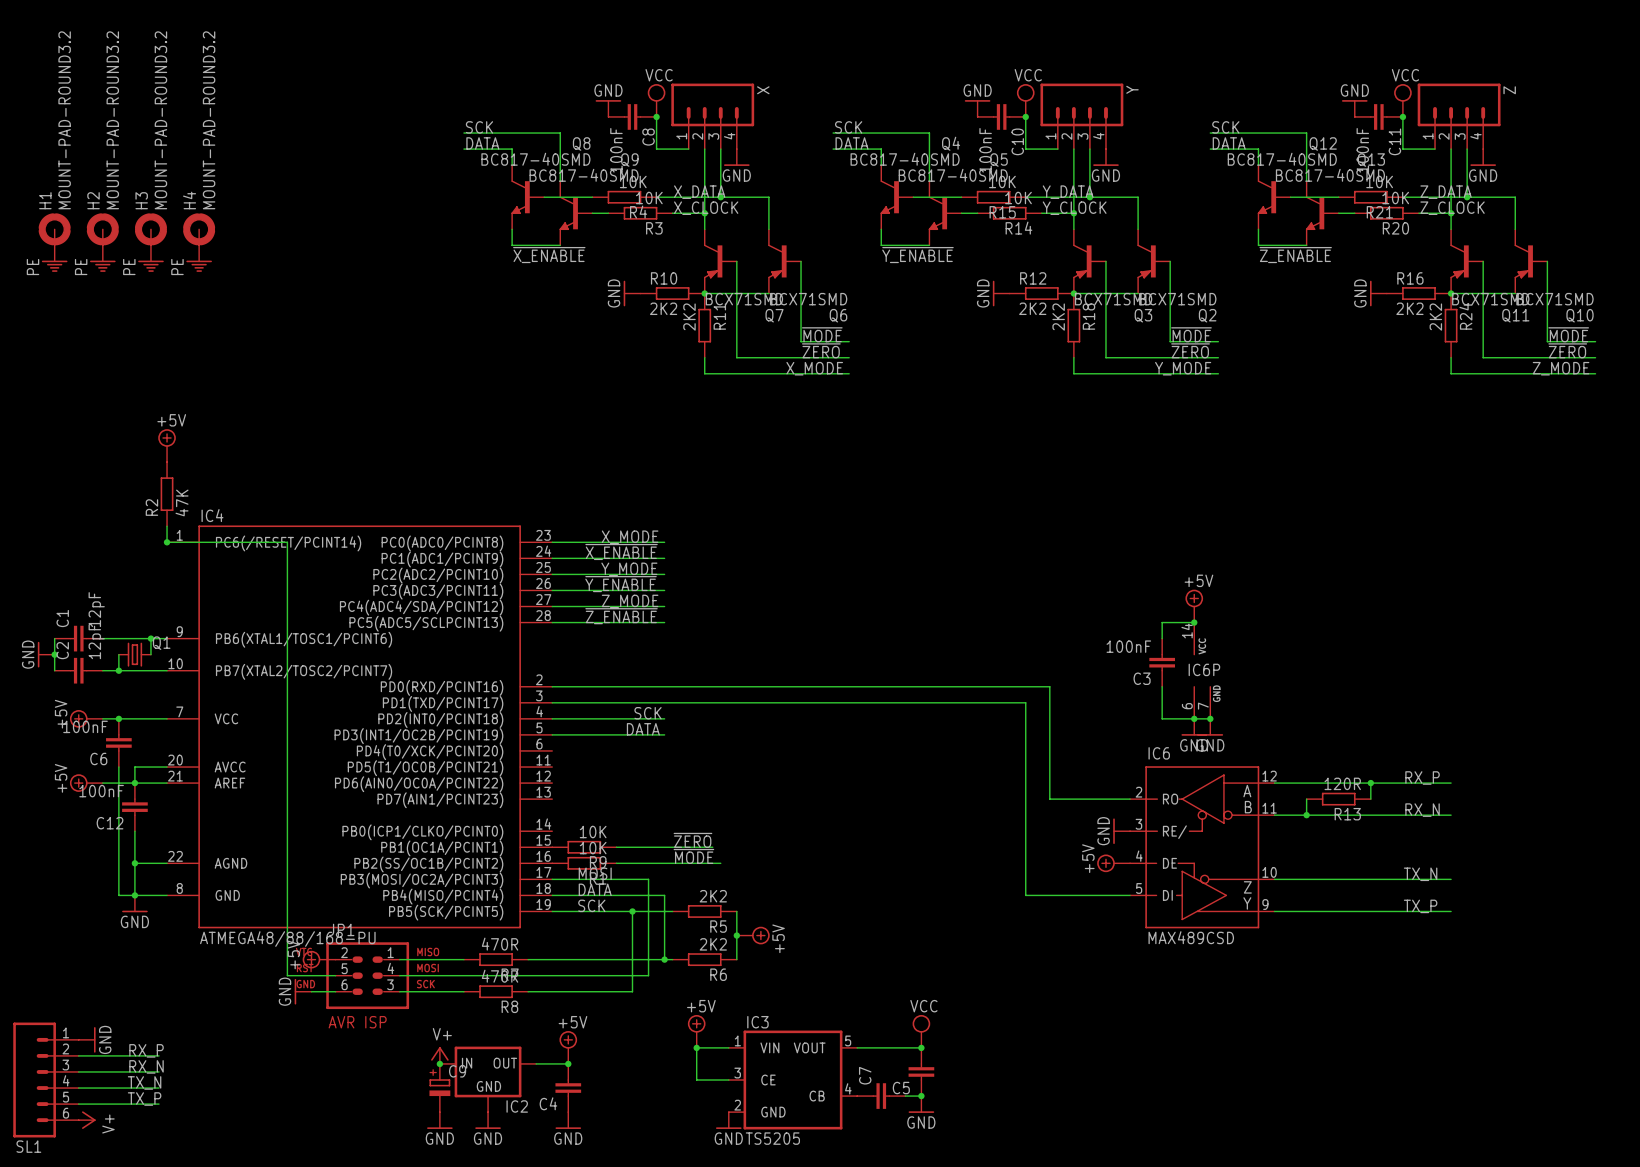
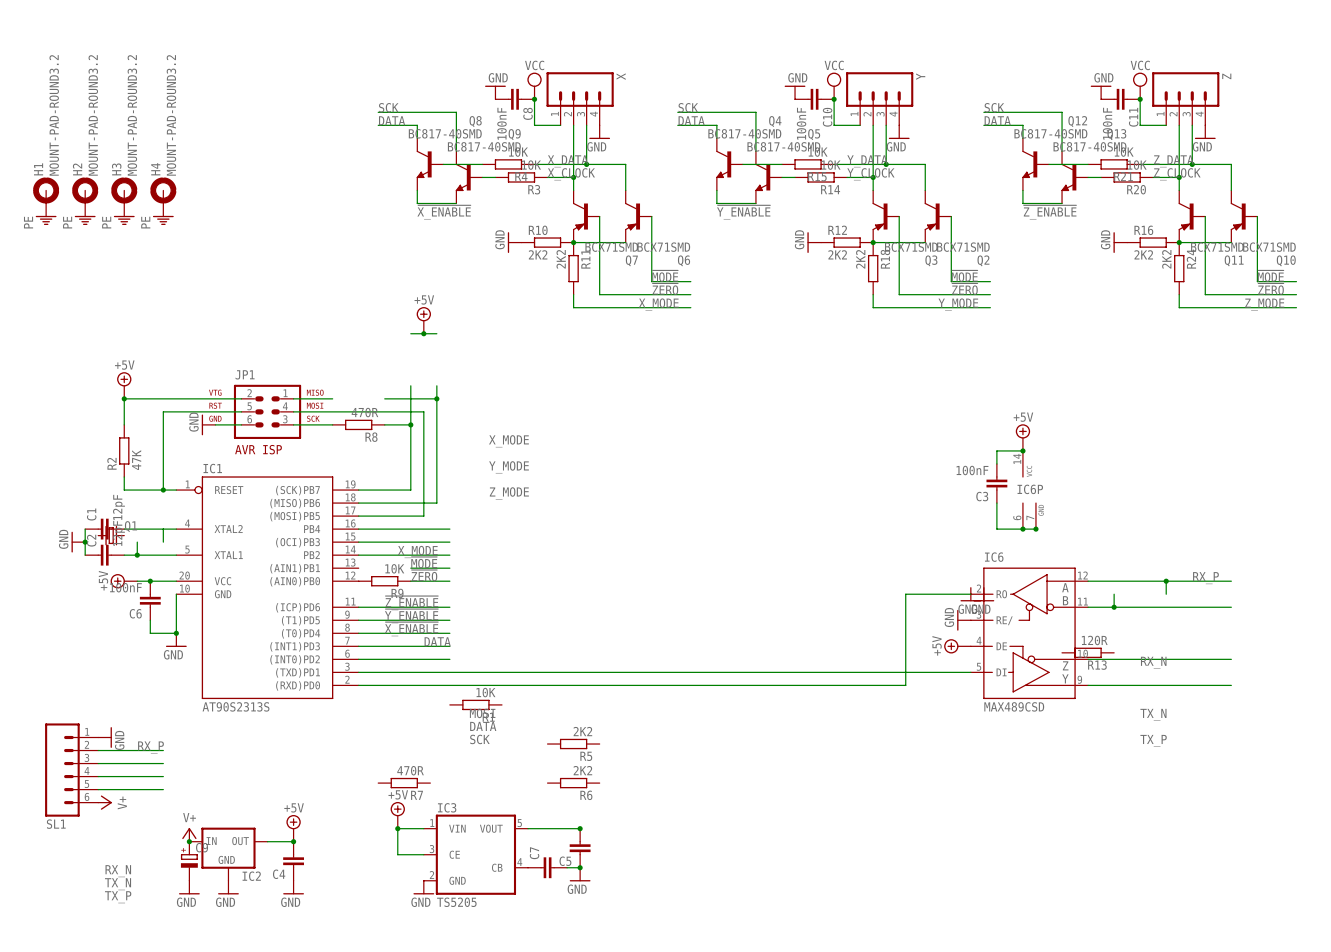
power symbol: none -> +5V (423, 320)
wire: none -> (410, 333) (436, 333)
junction: none -> (423, 333)
power symbol position: +5V (167, 445) -> +5V (124, 385)
wire: none -> (410, 385) (410, 490) (358, 490)
wire: none -> (436, 385) (436, 503) (358, 503)
junction: none -> (124, 398)
wire: none -> (241, 398) (124, 398) (124, 424)
wire: none -> (293, 398) (332, 398)
wire: none -> (384, 398) (436, 398)
junction: none -> (436, 398)
R2 position: (167, 494) -> (124, 450)
wire: none -> (241, 411) (163, 411) (163, 490)
wire: none -> (293, 411) (423, 411) (423, 516) (358, 516)
power symbol: none -> GND (208, 424)
wire: none -> (215, 424) (241, 424)
wire: none -> (293, 424) (332, 424)
wire: none -> (384, 424) (410, 424)
junction: none -> (410, 424)
wire: (167, 526) (167, 542) (287, 542) (287, 975) (335, 975) -> none
power symbol: none -> +5V (1022, 437)
junction: (167, 542) -> none
wire: (552, 542) (664, 542) -> none
junction: none -> (1022, 450)
label: ~{X_ENABLE} (621, 551) -> none
wire: (552, 558) (664, 558) -> none
wire: (552, 574) (664, 574) -> none
wire: none -> (124, 477) (124, 490) (176, 490)
label: ~{Y_ENABLE} (621, 584) -> none
wire: (552, 590) (664, 590) -> (358, 529) (449, 529)
junction: none -> (163, 490)
wire: (552, 606) (664, 606) -> (358, 542) (449, 542)
power symbol: +5V (1194, 606) -> none
label: ~{Z_ENABLE} (621, 616) -> none
wire: (552, 622) (664, 622) -> (358, 555) (449, 555)
wire: (1194, 622) (1162, 622) (1162, 638) -> (1022, 450) (996, 450) (996, 463)
junction: (1194, 622) -> none
wire: (54, 638) (54, 670) -> (85, 529) (85, 555)
C1 position: (78, 638) -> (104, 529)
wire: (102, 638) (167, 638) -> (124, 529) (176, 529)
junction: (150, 638) -> none
junction: none -> (1022, 529)
junction: none -> (1035, 529)
power symbol position: GND (46, 654) -> GND (78, 542)
junction: (54, 654) -> none
wire: (118, 654) (118, 670) -> (137, 542) (137, 555)
C3 position: (1162, 662) -> (996, 483)
C2 position: (78, 670) -> (104, 555)
wire: (102, 670) (167, 670) -> (124, 555) (176, 555)
junction position: (118, 670) -> (85, 542)
IC6P position: (1202, 670) -> (1029, 490)
label: none -> X_MODE (417, 551)
junction: none -> (137, 555)
wire: (552, 686) (1049, 686) (1049, 799) (1130, 799) -> none
wire: (1162, 686) (1162, 718) (1210, 718) -> (996, 503) (996, 529) (1035, 529)
label: none -> ~{MODE} (424, 562)
wire: none -> (410, 568) (449, 568)
wire: (552, 702) (1025, 702) (1025, 895) (1130, 895) -> none
label: none -> ~{ZERO} (424, 575)
power symbol: none -> +5V (123, 581)
wire: none -> (137, 581) (176, 581)
junction: none -> (150, 581)
wire: none -> (410, 581) (449, 581)
junction: none -> (1166, 581)
label: SCK (648, 713) -> none
power symbol: +5V (86, 718) -> none
wire: (102, 718) (167, 718) -> none
junction: (118, 718) -> none
IC1: none -> AT90S2313S (267, 587)
wire: (552, 718) (664, 718) -> (358, 633) (449, 633)
junction: (1194, 718) -> none
junction: (1210, 718) -> none
wire: none -> (176, 594) (176, 633) (150, 633) (150, 620)
IC4: ATMEGA48/88/168-PU (359, 726) -> none
wire: none -> (970, 594) (905, 594) (905, 685) (358, 685)
label position: DATA (643, 729) -> DATA (437, 641)
wire: (552, 734) (664, 734) -> (358, 646) (449, 646)
label: none -> ~{Z_ENABLE} (411, 603)
C6 position: (118, 742) -> (150, 600)
wire: none -> (358, 607) (449, 607)
junction: none -> (1114, 607)
label: none -> ~{Y_ENABLE} (411, 616)
wire: none -> (358, 620) (449, 620)
wire: (118, 767) (118, 895) (167, 895) -> none
wire: (167, 767) (134, 767) (134, 783) -> none
label: none -> ~{X_ENABLE} (411, 629)
junction: none -> (176, 633)
label position: RX_P (1422, 777) -> RX_P (1205, 578)
power symbol: +5V (86, 783) -> none
wire: (102, 783) (167, 783) -> none
junction: (134, 783) -> none
power symbol: none -> GND (176, 640)
wire: (1274, 783) (1451, 783) -> (1088, 581) (1231, 581)
wire: (1370, 783) (1370, 799) -> (1166, 581) (1166, 594)
junction: (1370, 783) -> none
power symbol: none -> +5V (957, 646)
wire: (1306, 799) (1306, 815) -> (1114, 594) (1114, 607)
C12: 100nF (134, 807) -> none
wire: none -> (358, 659) (449, 659)
wire: (1274, 815) (1451, 815) -> (1088, 607) (1231, 607)
junction: (1306, 815) -> none
wire: none -> (358, 672) (970, 672)
wire: (134, 831) (134, 895) -> none
power symbol position: GND (1121, 831) -> GND (964, 620)
label: ~{ZERO} (692, 840) -> none
R9 position: (584, 847) -> (384, 581)
wire: (616, 847) (712, 847) -> none
IC6 position: (1202, 847) -> (1029, 633)
label: ~{MODE} (693, 856) -> none
wire: (134, 863) (167, 863) -> none
junction: (134, 863) -> none
wire: (616, 863) (720, 863) -> none
power symbol: +5V (1113, 863) -> none
wire: (552, 879) (648, 879) (648, 975) (399, 975) -> none
wire: (1274, 879) (1451, 879) -> (1088, 659) (1231, 659)
junction: (134, 895) -> none
wire: (552, 895) (664, 895) (664, 959) -> none
power symbol rotation: 0° (134, 911) -> 90° counterclockwise (111, 737)
wire: (552, 911) (672, 911) -> none
wire: (632, 911) (632, 991) (528, 991) -> none
junction: (632, 911) -> none
wire: (736, 911) (736, 959) -> none
wire: (1274, 911) (1451, 911) -> (1088, 685) (1231, 685)
junction: (736, 935) -> none
power symbol: +5V (753, 935) -> none
power symbol rotation: 0° (311, 959) -> 90° clockwise (293, 822)
power symbol position: +5V (319, 959) -> +5V (293, 828)
wire: (399, 959) (463, 959) -> none
wire: (528, 959) (672, 959) -> none
junction: (664, 959) -> none
JP1 position: (367, 975) -> (267, 411)
power symbol: none -> V+ (105, 802)
power symbol: GND (303, 991) -> none
wire: (311, 991) (335, 991) -> none
wire: (399, 991) (463, 991) -> none
R8 position: (496, 991) -> (358, 424)
power symbol: none -> +5V (397, 815)
junction: none -> (397, 828)
wire: none -> (423, 828) (397, 828) (397, 854) (423, 854)
wire: none -> (528, 828) (580, 828)
junction: none -> (580, 828)
power symbol: none -> V+ (189, 834)
junction: none -> (189, 841)
wire: none -> (267, 841) (293, 841)
junction: none -> (293, 841)
power symbol: +5V (696, 1031) -> none
power symbol: VCC (921, 1031) -> none
power symbol: GND (87, 1039) -> none
power symbol: +5V (568, 1047) -> none
junction: (696, 1047) -> none
wire: (728, 1047) (696, 1047) (696, 1080) (728, 1080) -> none
wire: (857, 1047) (921, 1047) -> none
junction: (921, 1047) -> none
label position: RX_P (146, 1050) -> RX_P (150, 747)
wire: (78, 1055) (159, 1055) -> (98, 750) (163, 750)
power symbol: V+ (439, 1055) -> none
junction: (439, 1063) -> none
wire: (536, 1063) (568, 1063) -> none
junction: (568, 1063) -> none
wire: none -> (567, 867) (580, 867)
junction: none -> (580, 867)
wire: (78, 1071) (159, 1071) -> (98, 763) (163, 763)
C5 position: (921, 1071) -> (580, 848)
IC2 position: (488, 1079) -> (228, 854)
SL1 position: (46, 1080) -> (71, 770)
IC3 position: (793, 1080) -> (475, 854)
wire: (78, 1088) (159, 1088) -> (98, 776) (163, 776)
power symbol: none -> GND (189, 887)
power symbol: none -> GND (228, 887)
power symbol: none -> GND (293, 887)
C9 position: (439, 1088) -> (189, 861)
power symbol: none -> GND (423, 887)
C4 position: (568, 1088) -> (293, 861)
C7 position: (881, 1096) -> (547, 867)
wire: (905, 1096) (921, 1096) -> none
junction: (921, 1096) -> none
wire: (78, 1104) (159, 1104) -> (98, 789) (163, 789)
power symbol: GND (921, 1104) -> none
power symbol: V+ (87, 1120) -> none
power symbol: GND (439, 1120) -> none
power symbol: GND (488, 1120) -> none
power symbol: GND (568, 1120) -> none
power symbol position: GND (728, 1120) -> GND (580, 874)

